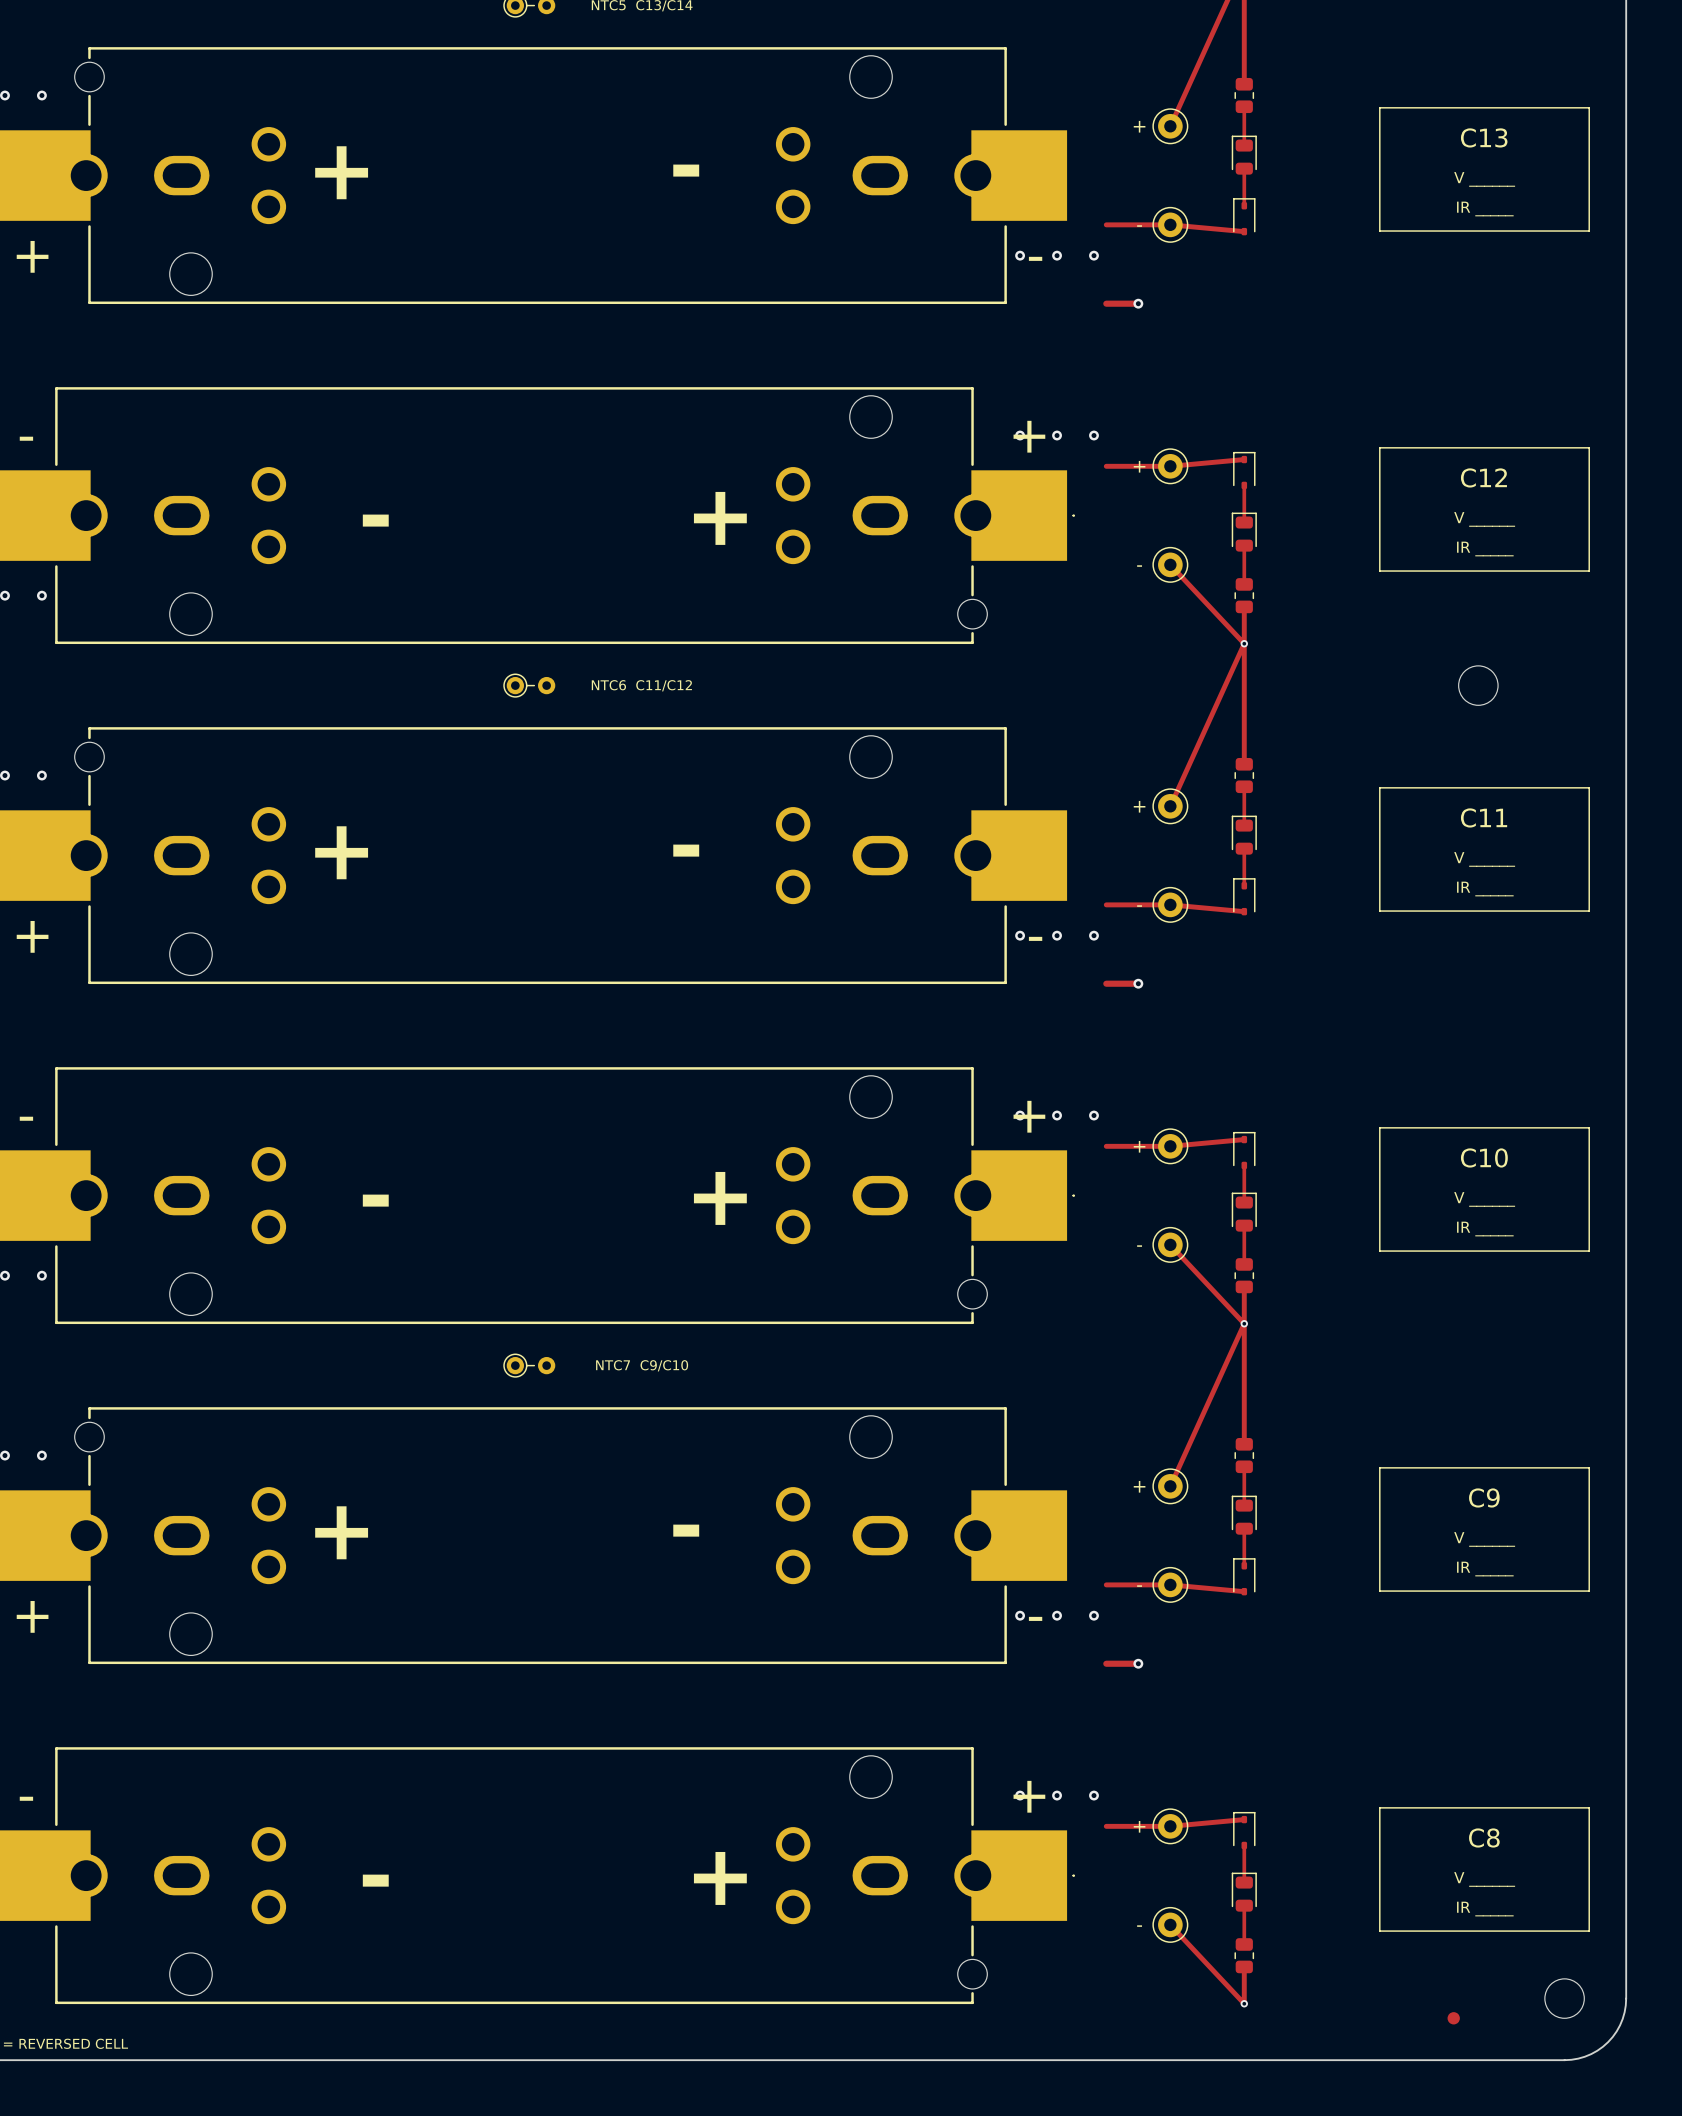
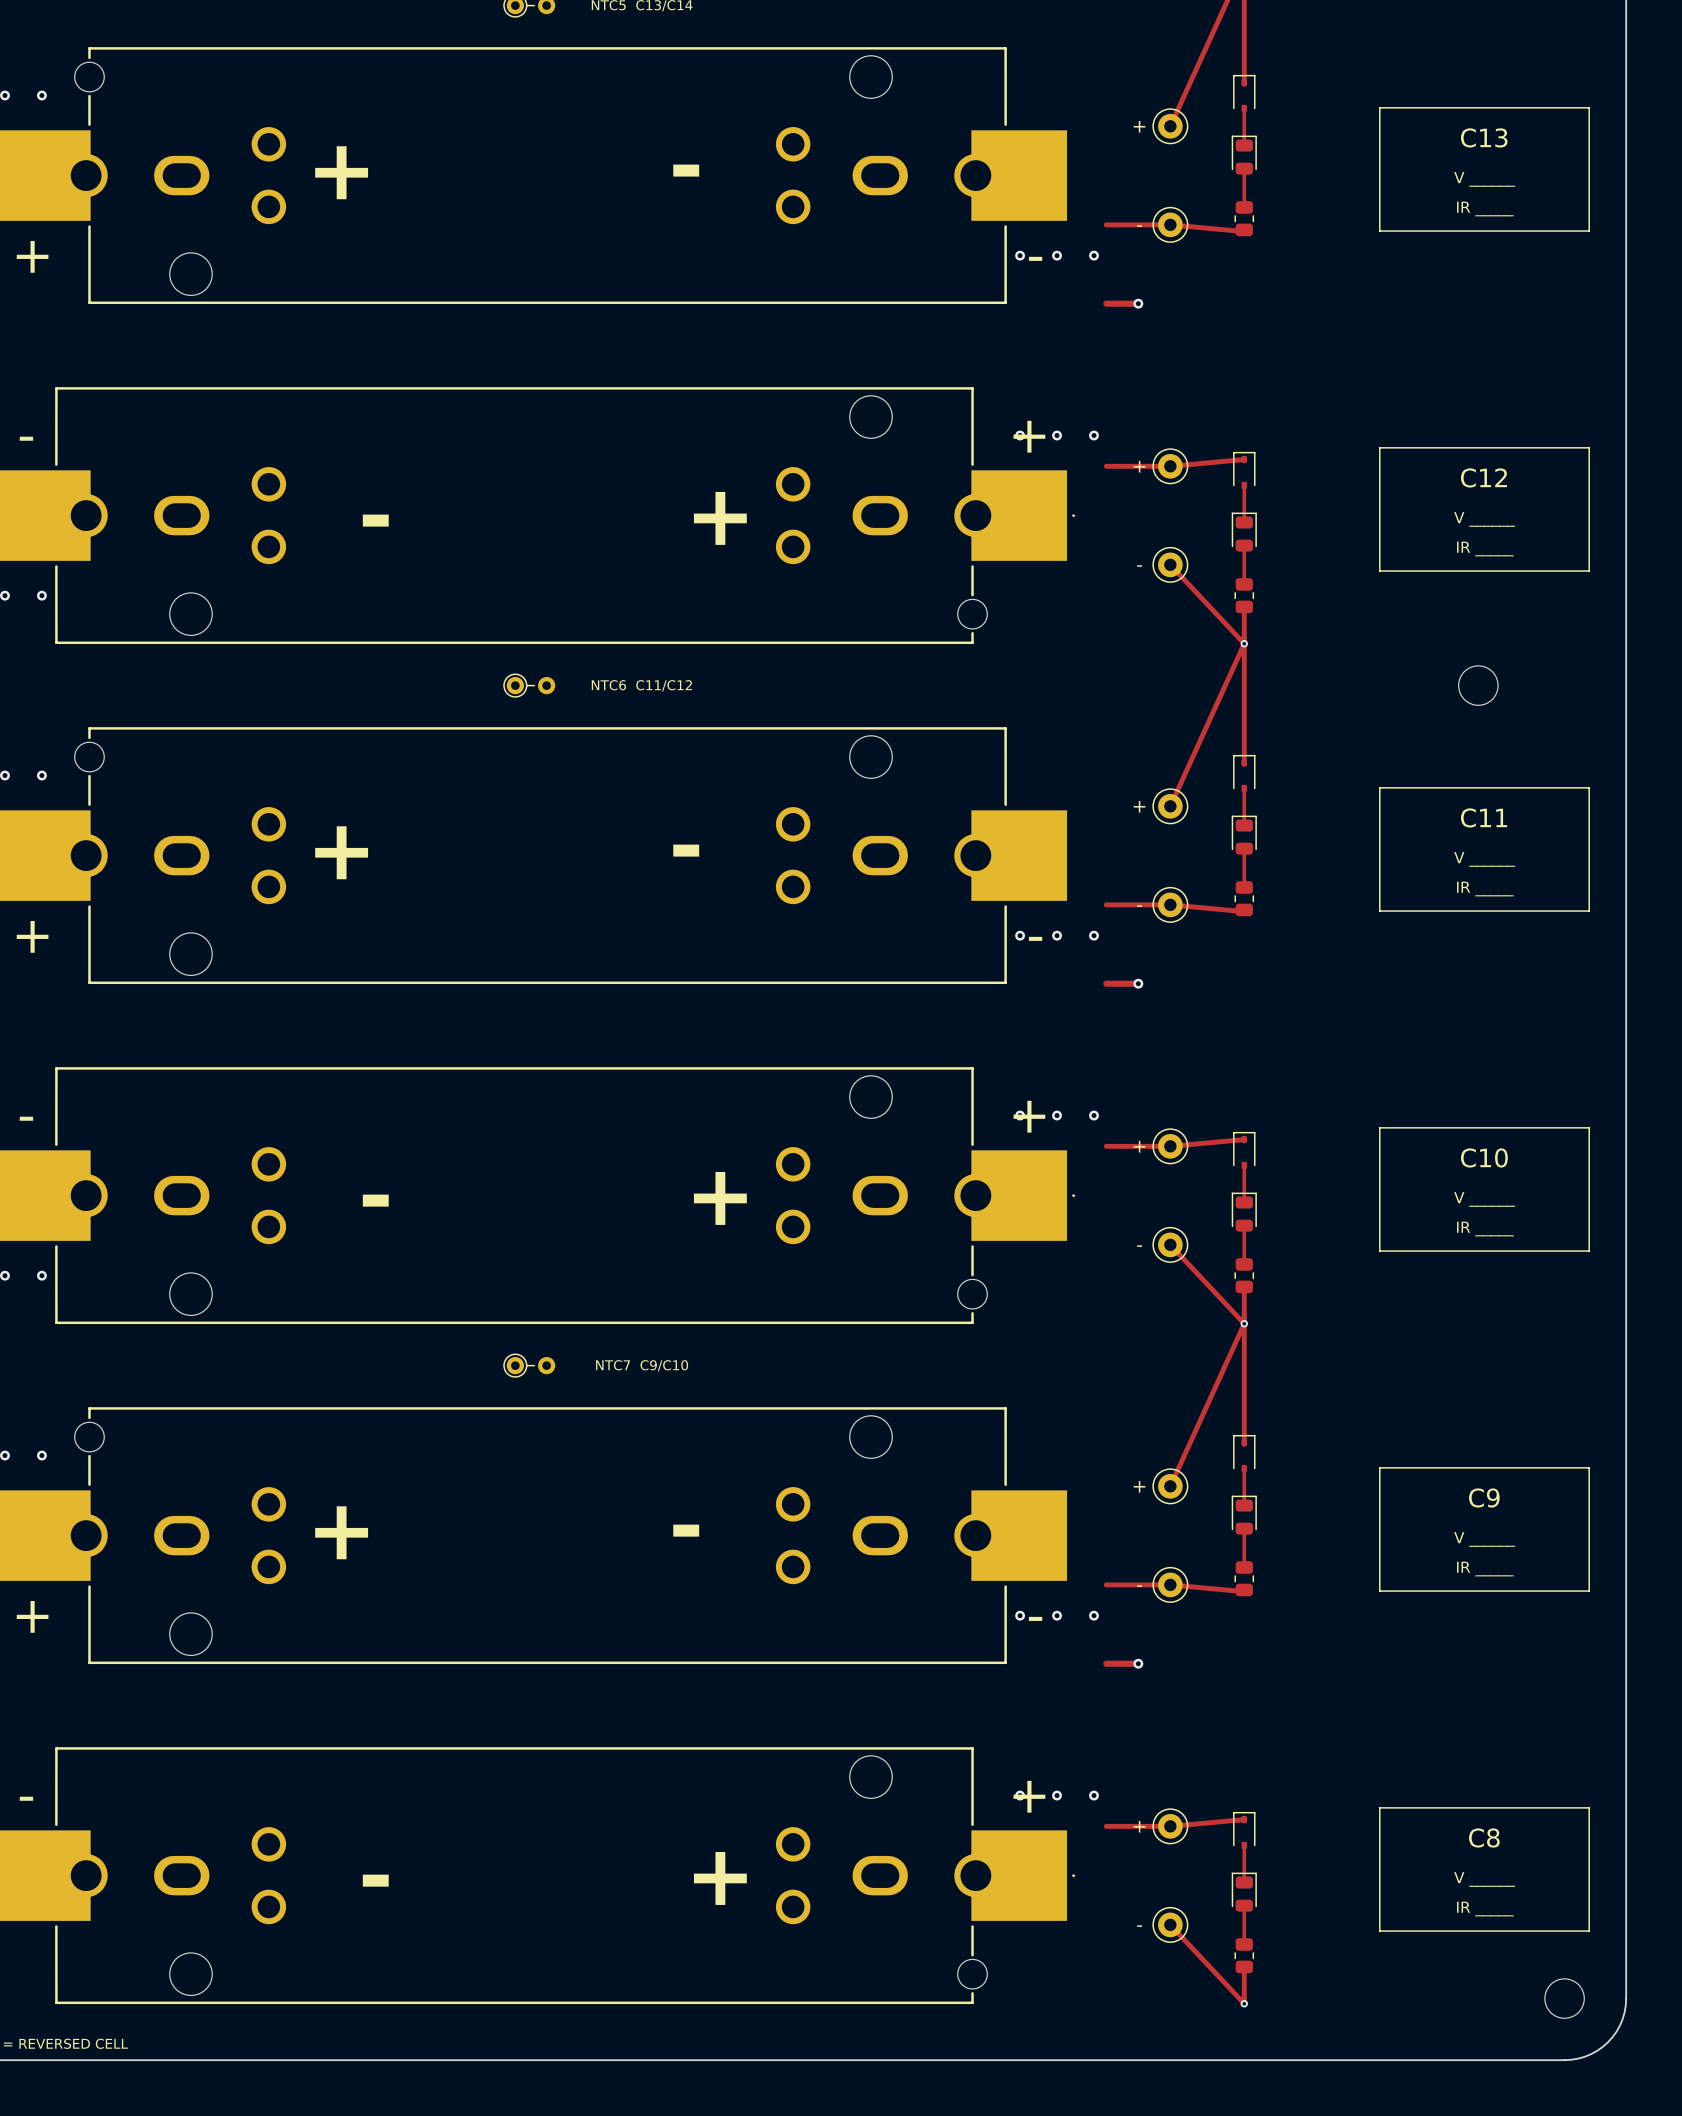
part footprint: [1234, 77, 1255, 114] -> [1233, 74, 1256, 113]
part footprint: [1233, 198, 1256, 236] -> [1234, 201, 1255, 237]
part footprint: [1234, 757, 1255, 794] -> [1233, 754, 1256, 793]
part footprint: [1233, 878, 1256, 916] -> [1234, 881, 1255, 917]
part footprint: [1234, 1437, 1255, 1474] -> [1233, 1434, 1256, 1473]
part footprint: [1233, 1558, 1256, 1596] -> [1234, 1561, 1255, 1597]
part: (1453, 2018) -> none

